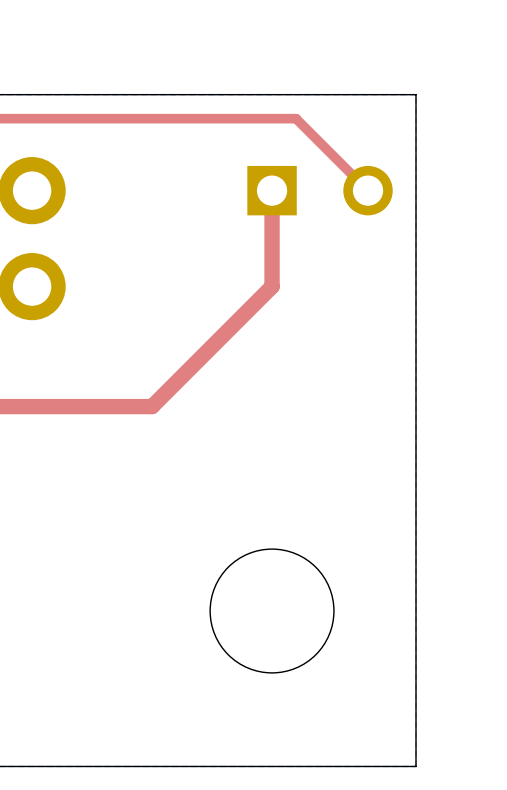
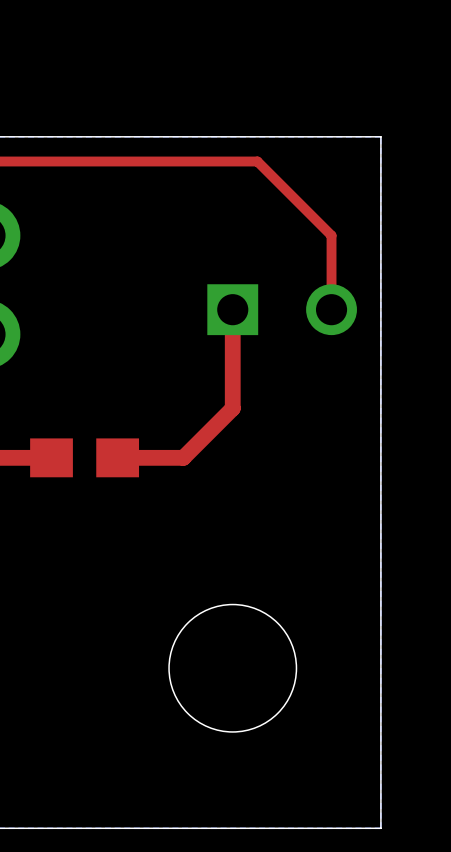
top track: (272, 190) (272, 262) -> (331, 235) (331, 309)
part position: (320, 190) -> (282, 309)
top track: (272, 286) (152, 406) (95, 406) -> (232, 334) (232, 408) (183, 457) (117, 457)
part: none -> (84, 457)

